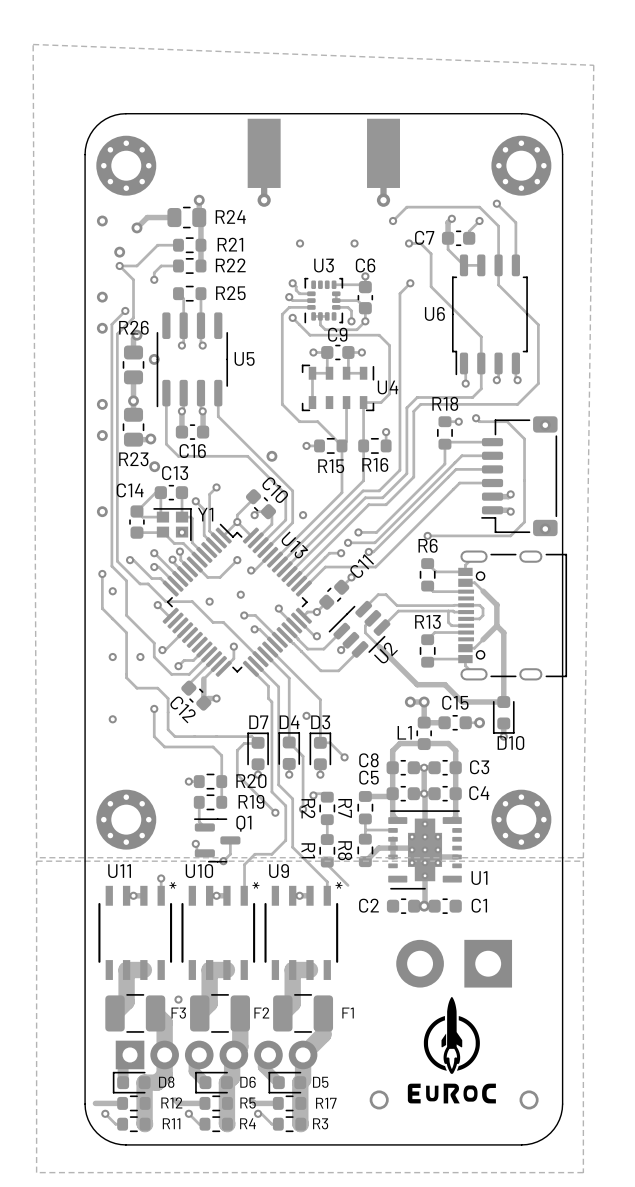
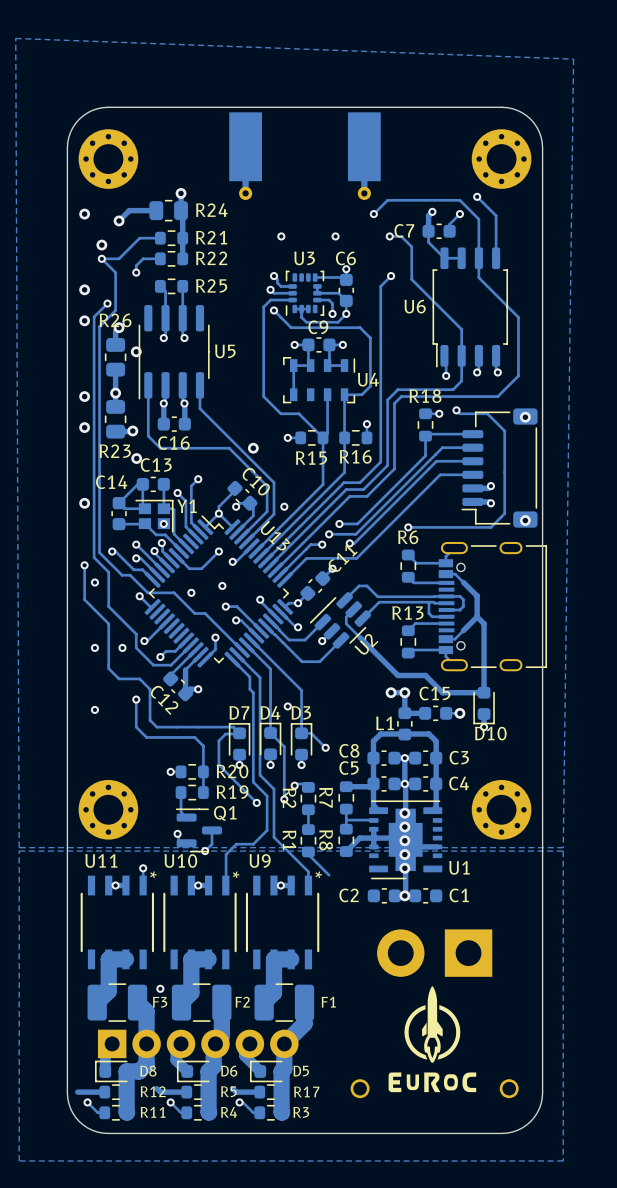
U1 footprint: [388, 810, 462, 890] -> [369, 800, 443, 880]
via: none -> (404, 813)
via: none -> (404, 826)
via: none -> (404, 840)
via: none -> (404, 854)
via: none -> (404, 868)

